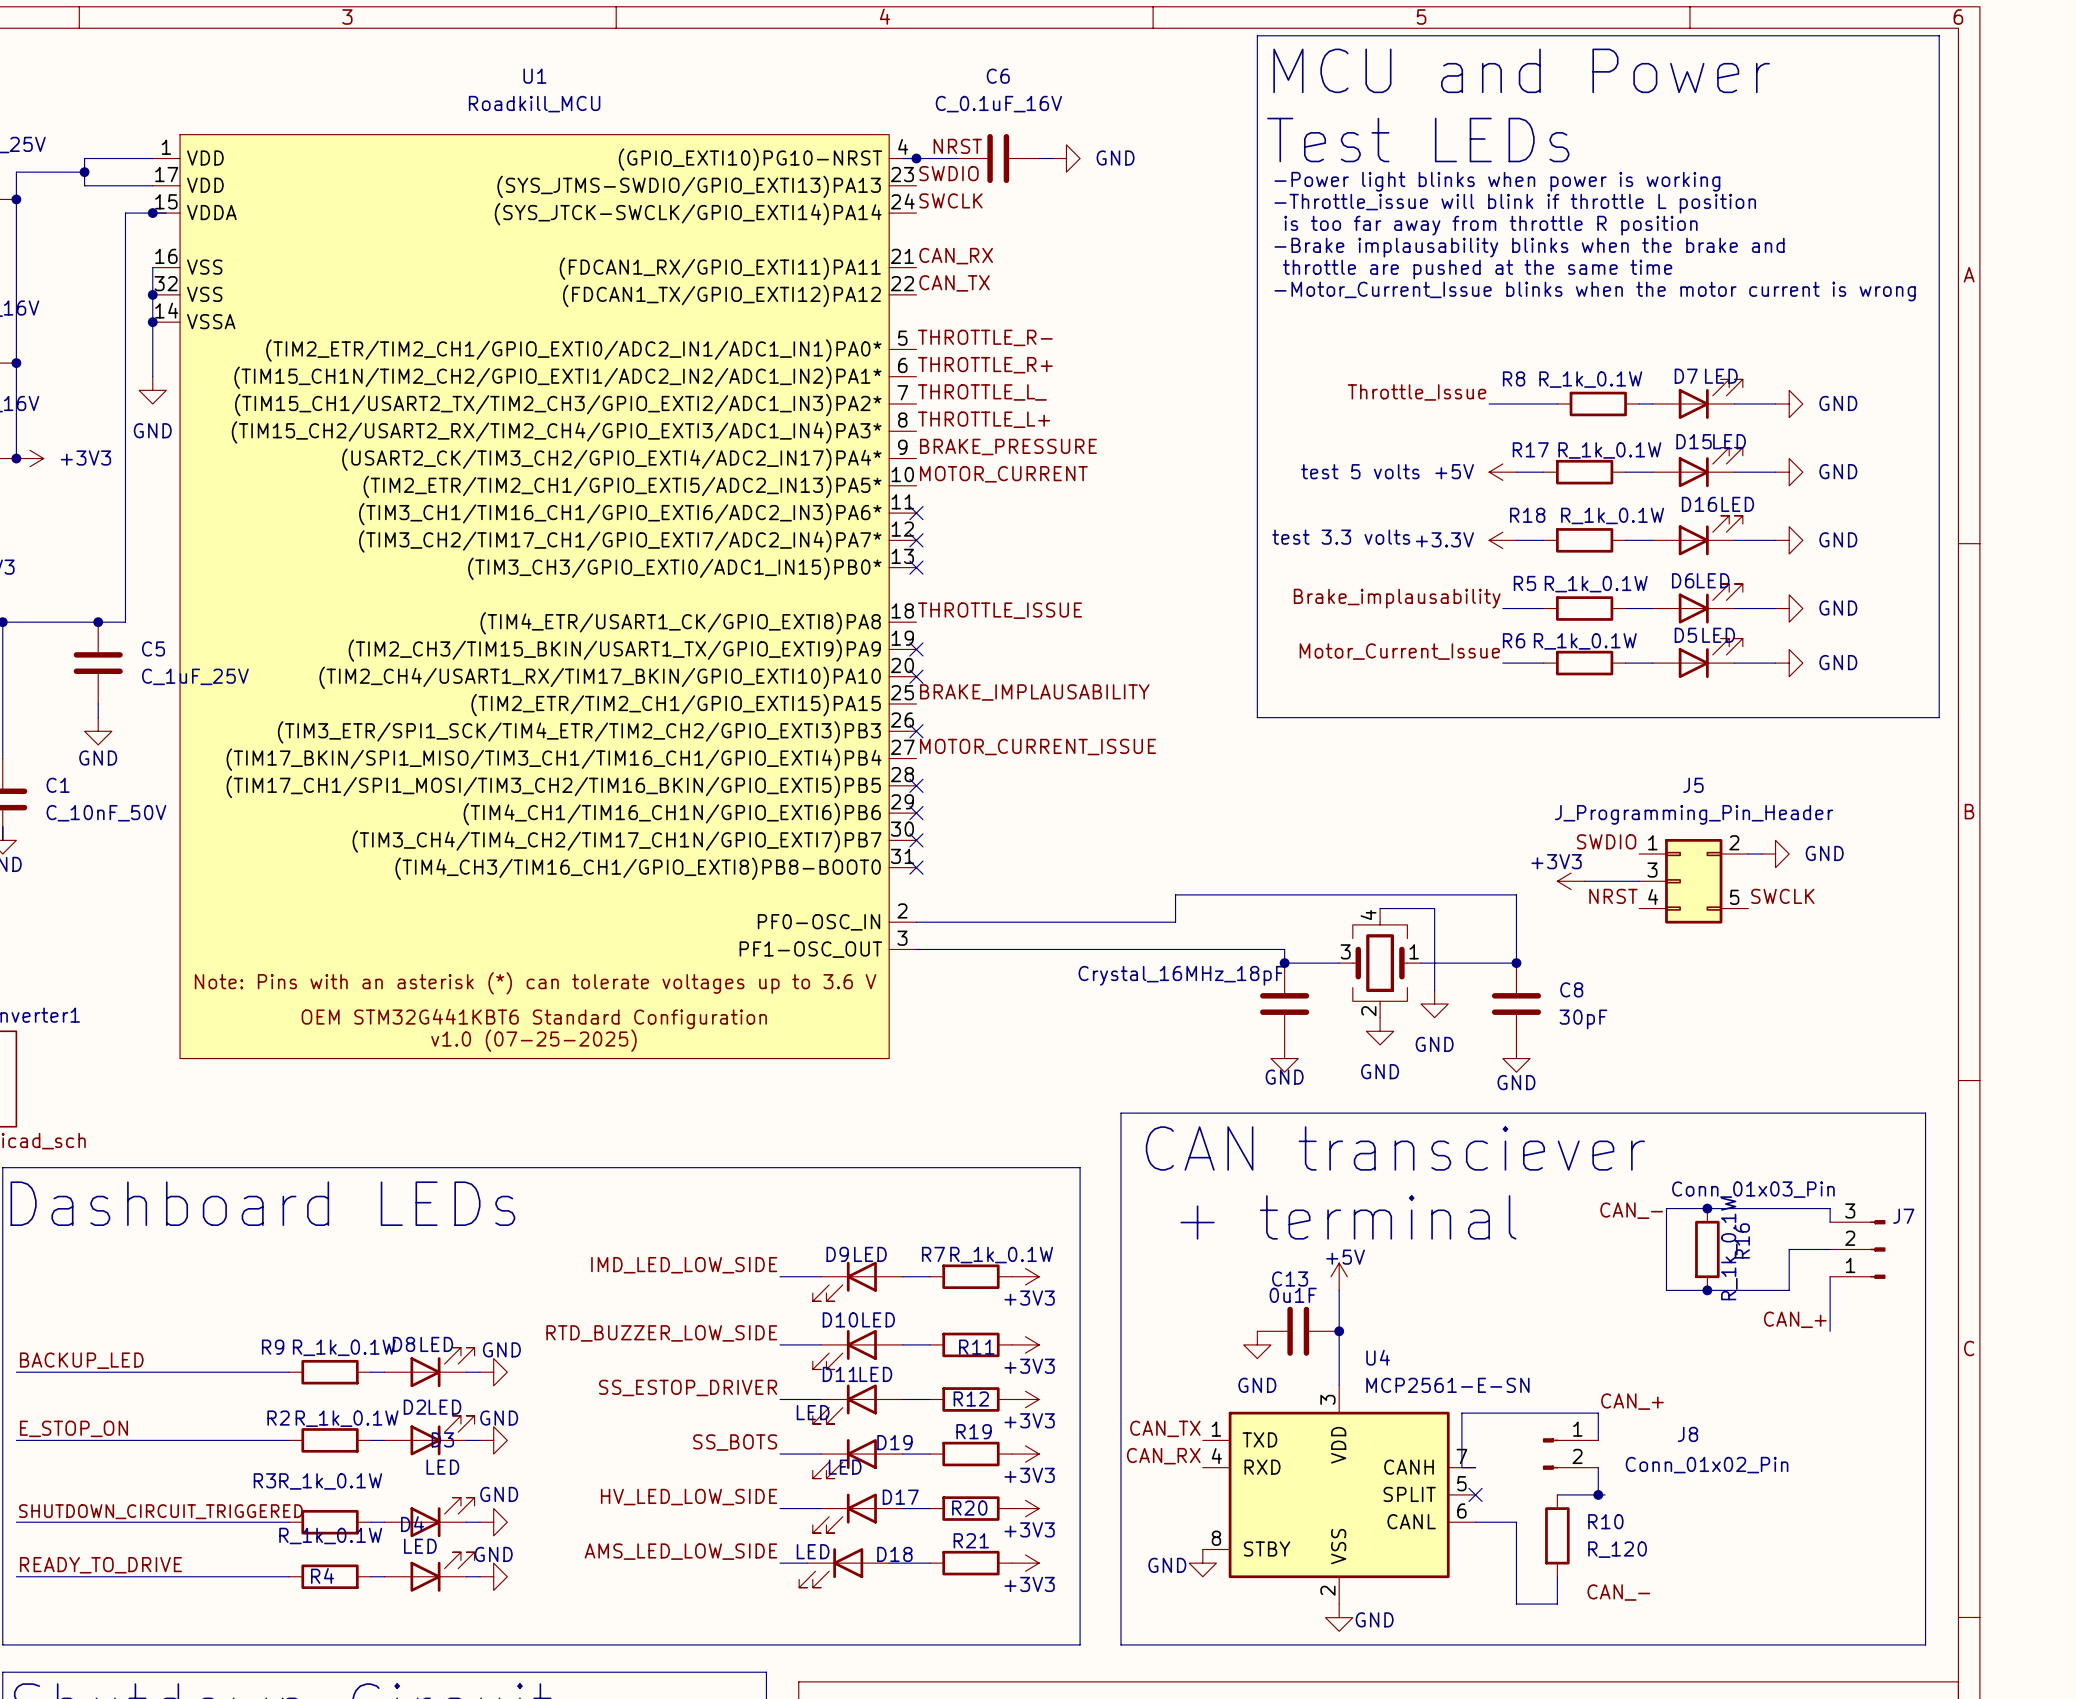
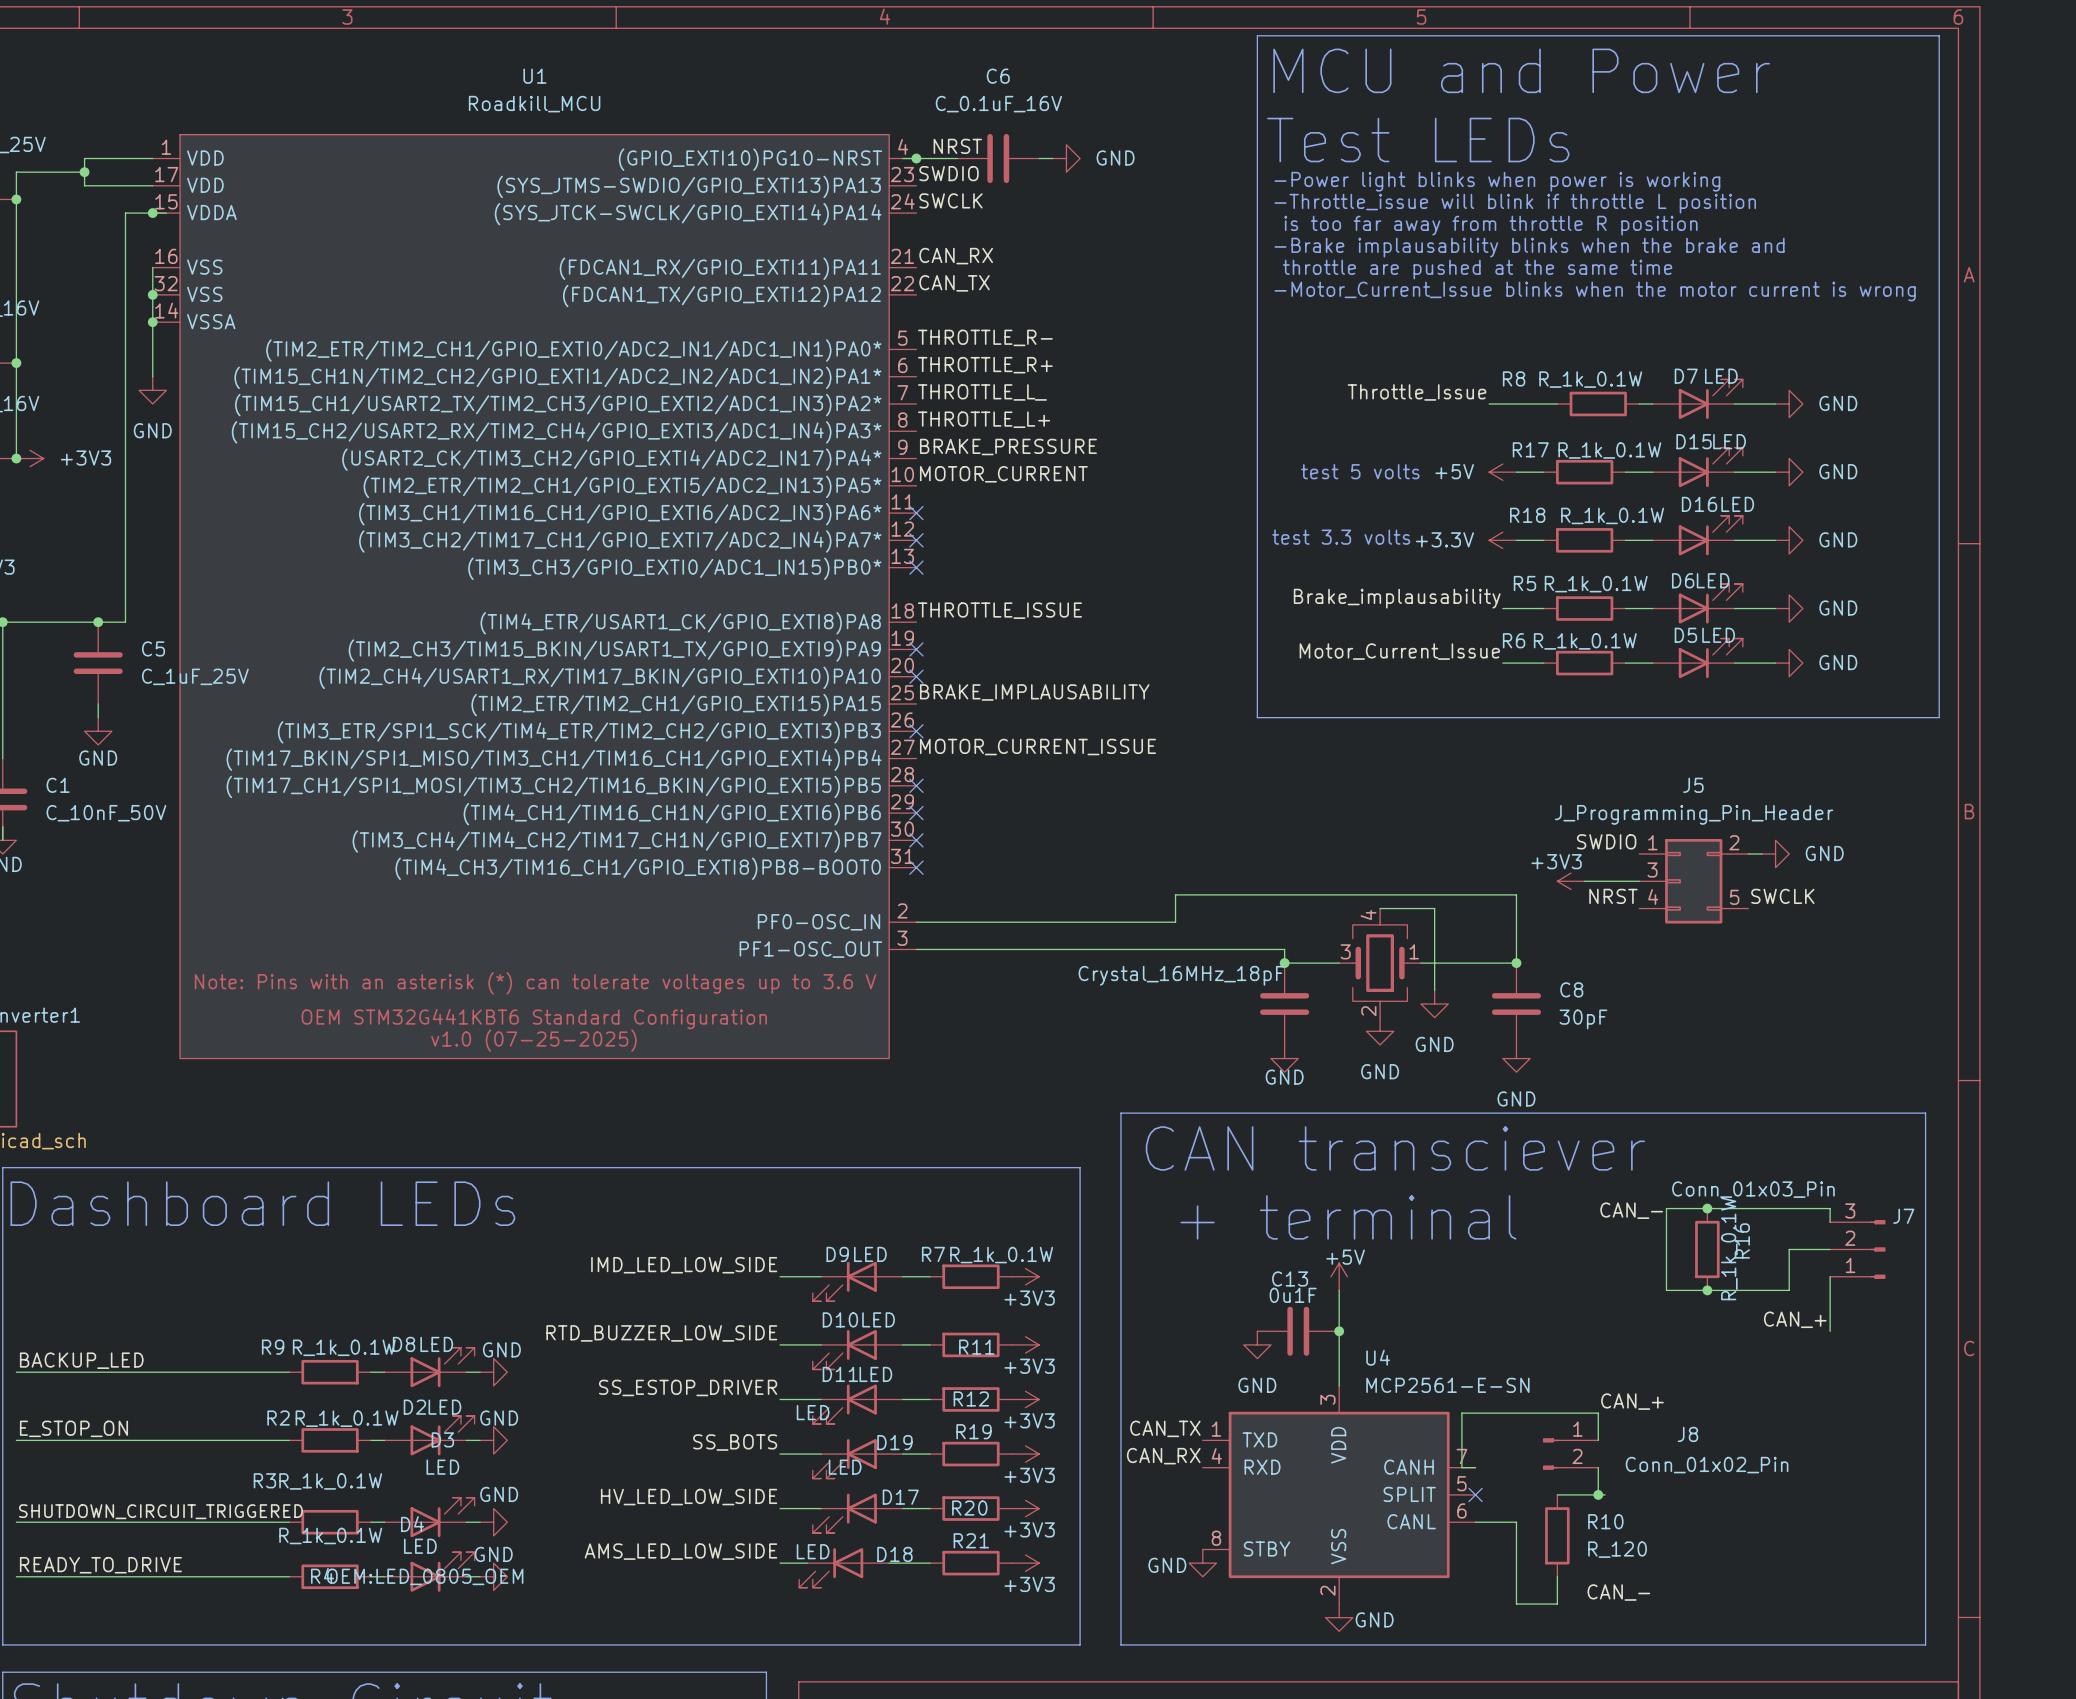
power symbol text position: GND (1516, 1082) -> GND (1516, 1098)
D4 text: none -> OEM:LED_0805_OEM (425, 1576)

